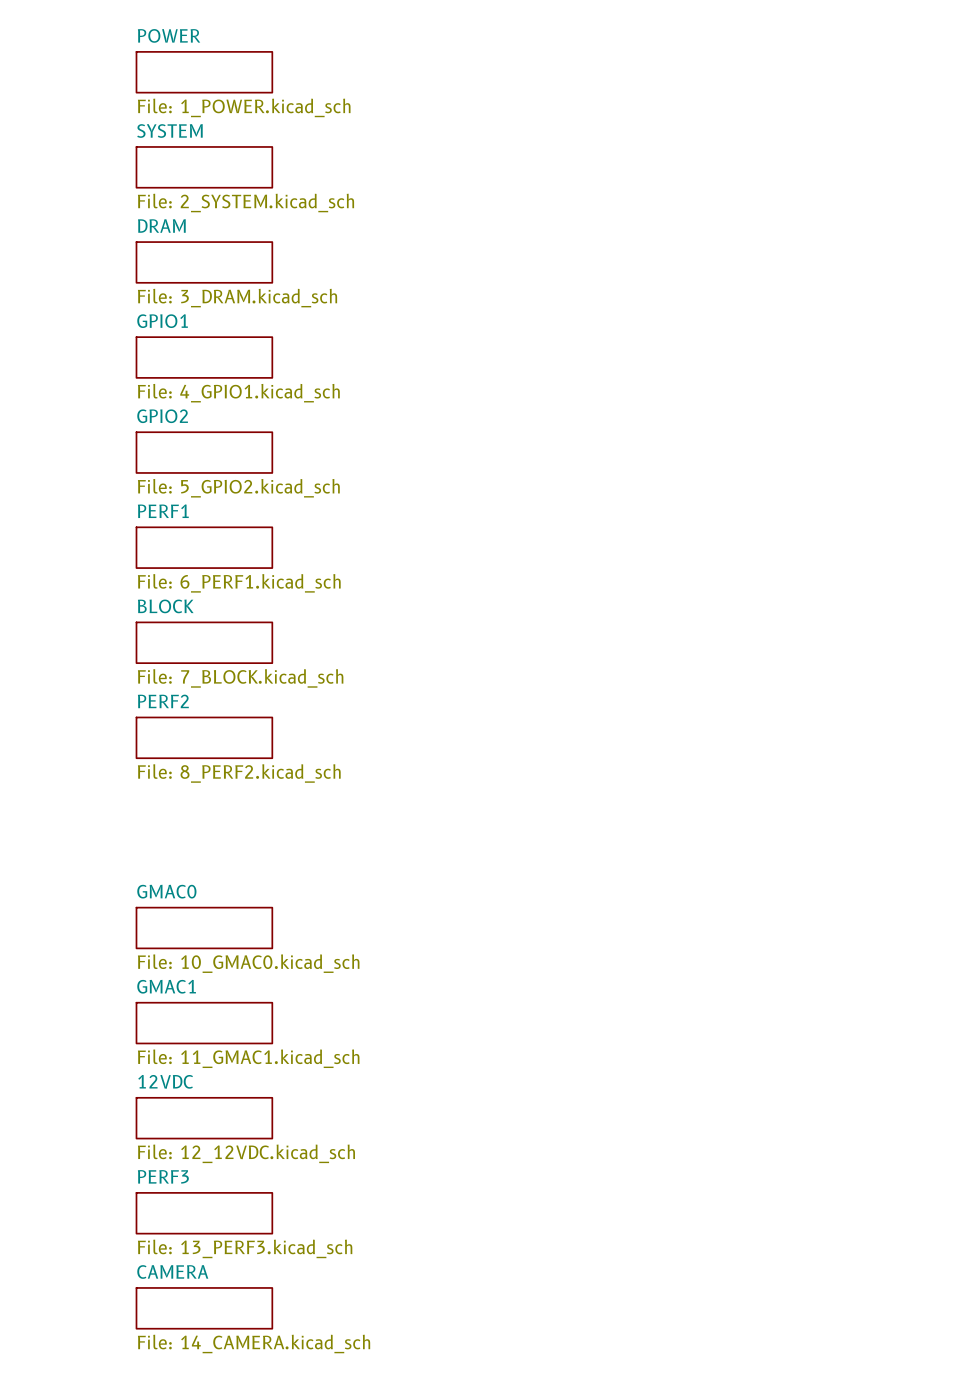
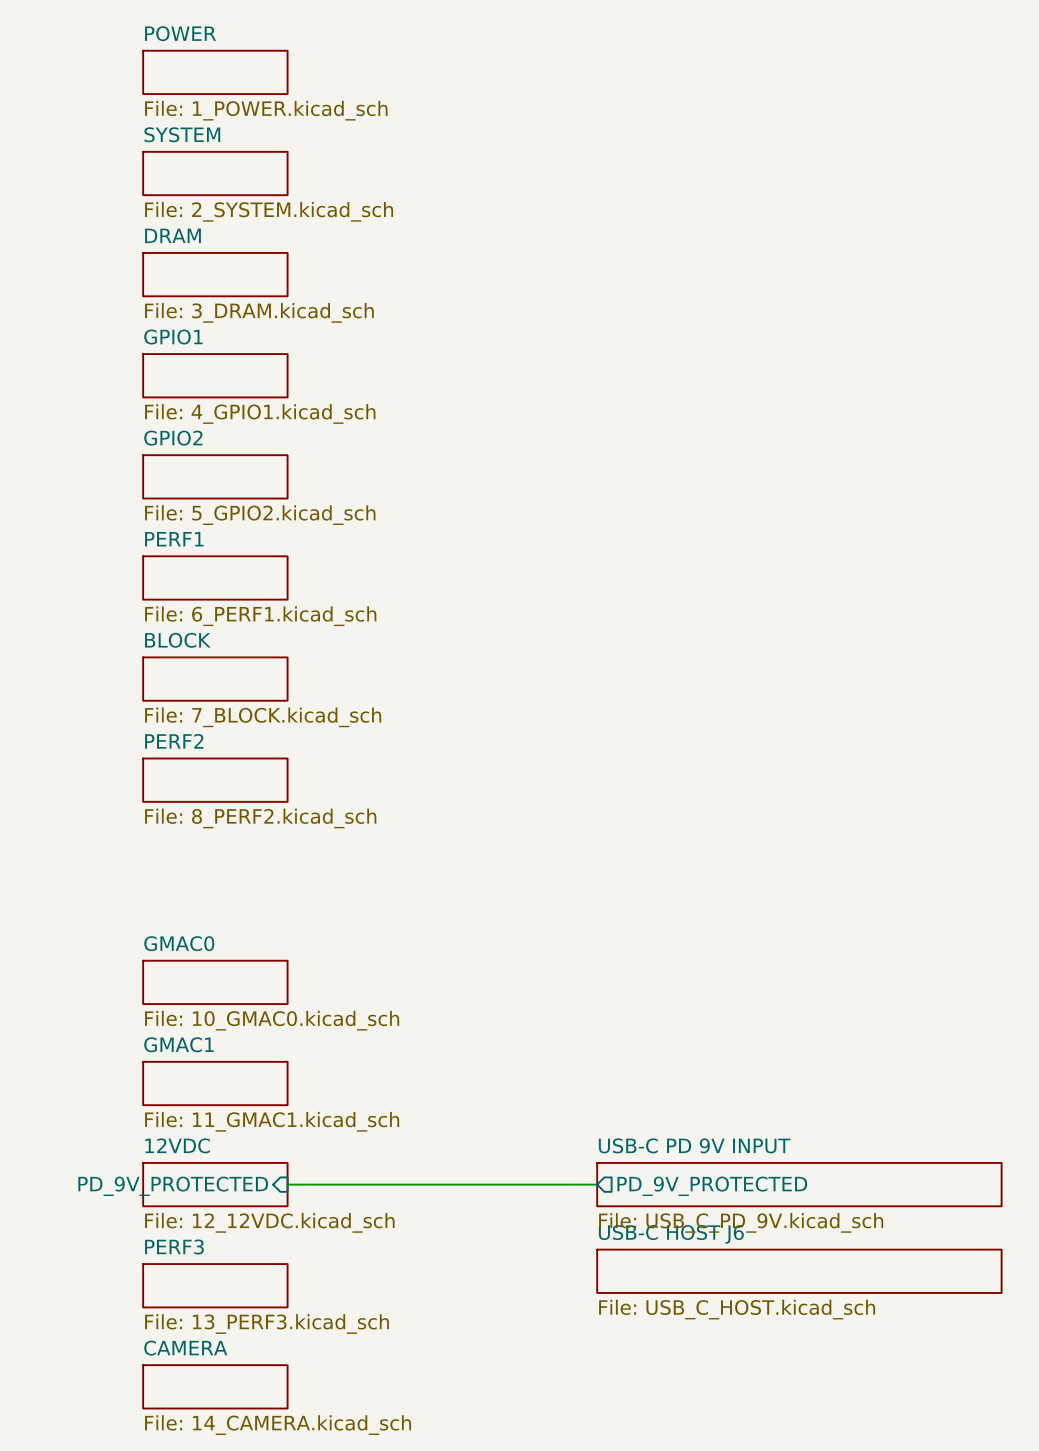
wire: none -> (287, 1184) (597, 1184)
sheet USB-C PD 9V INPUT: none -> File: USB_C_PD_9V.kicad_sch (799, 1184)
sheet pin: none -> PD_9V_PROTECTED (173, 1186)
sheet pin: none -> PD_9V_PROTECTED (712, 1186)
sheet USB-C HOST J6: none -> File: USB_C_HOST.kicad_sch (799, 1271)

